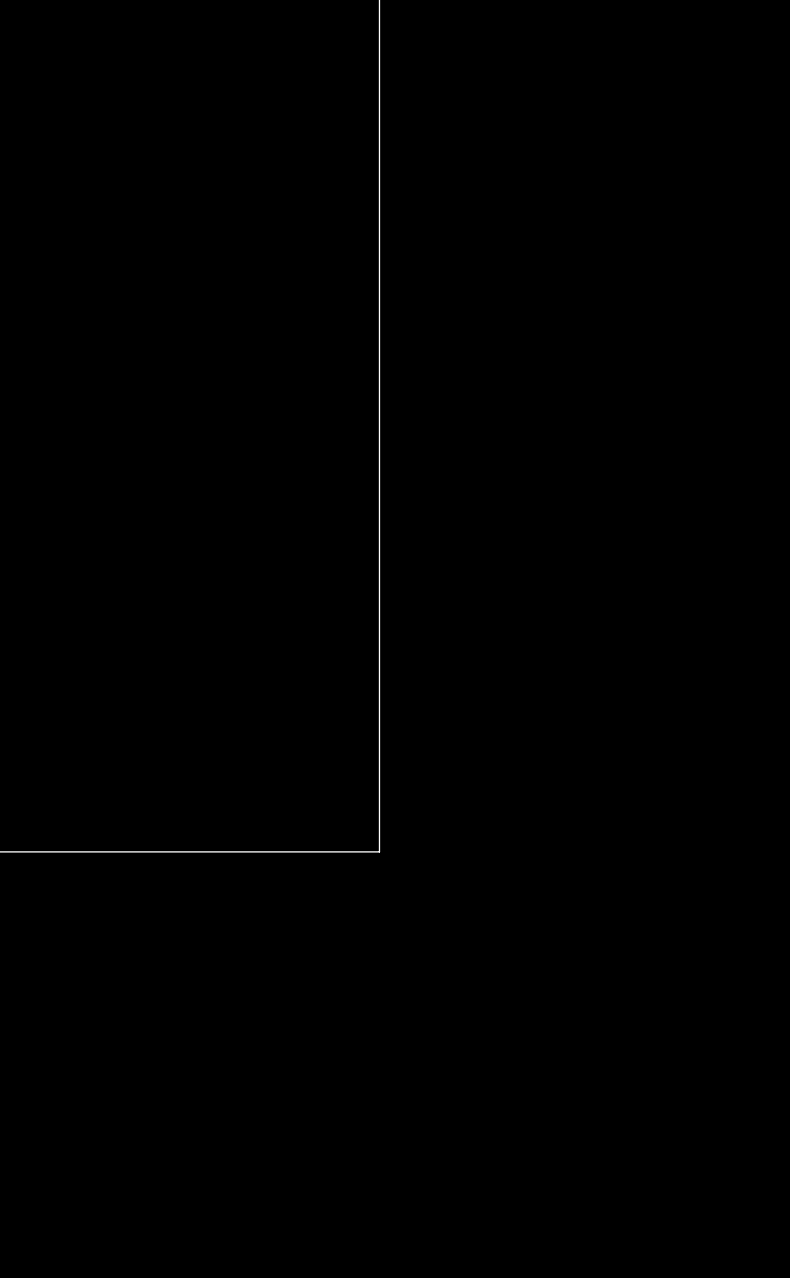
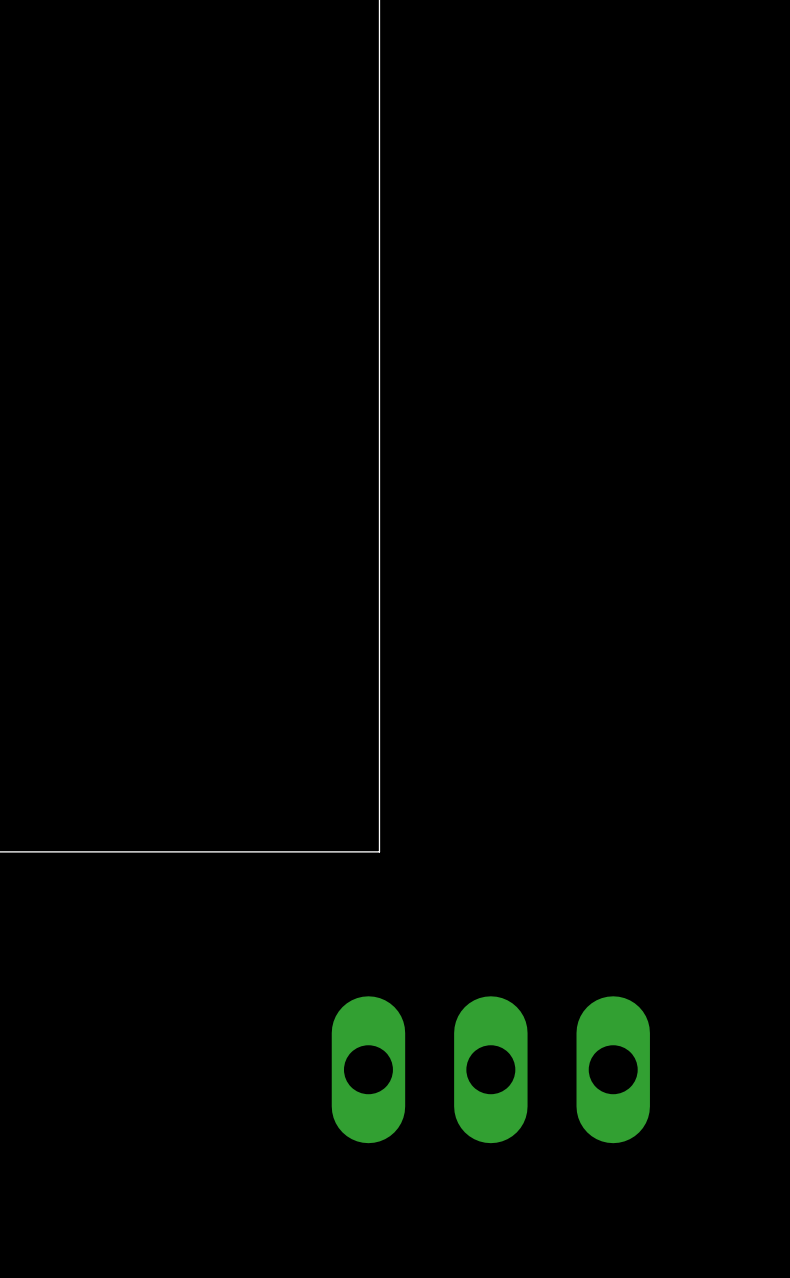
part: none -> (490, 1069)

